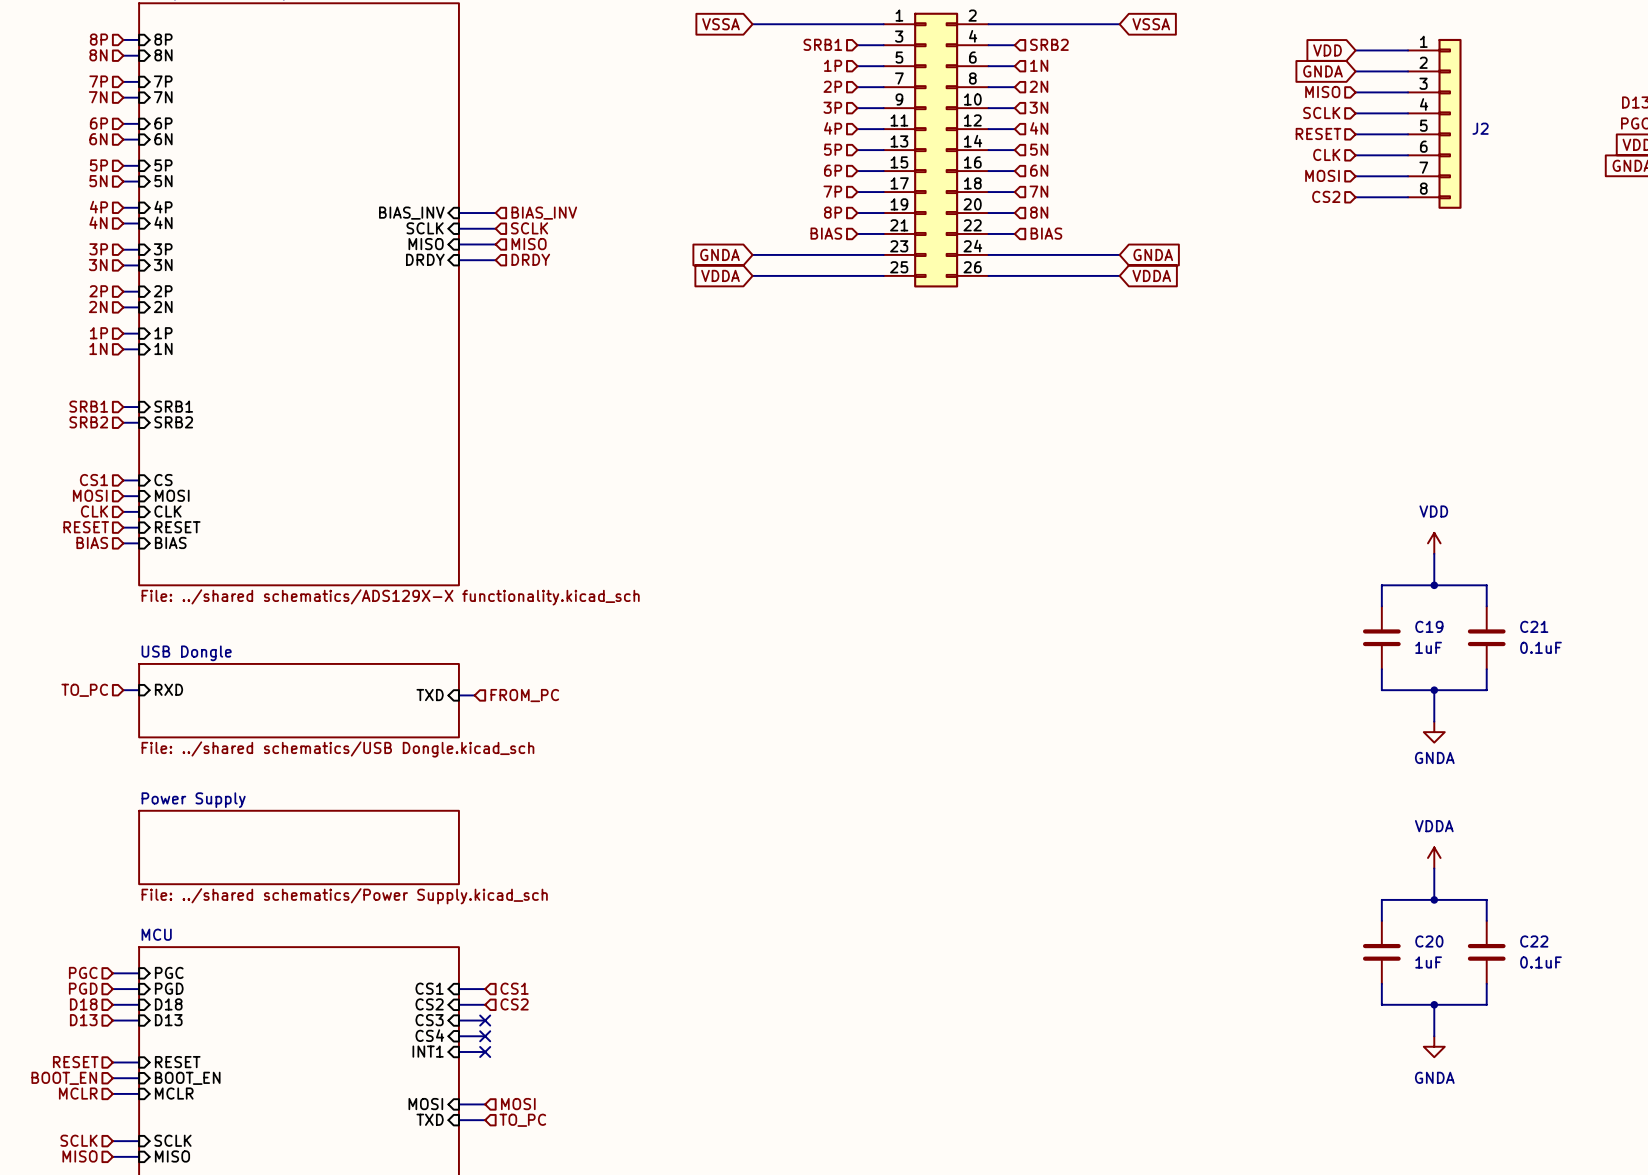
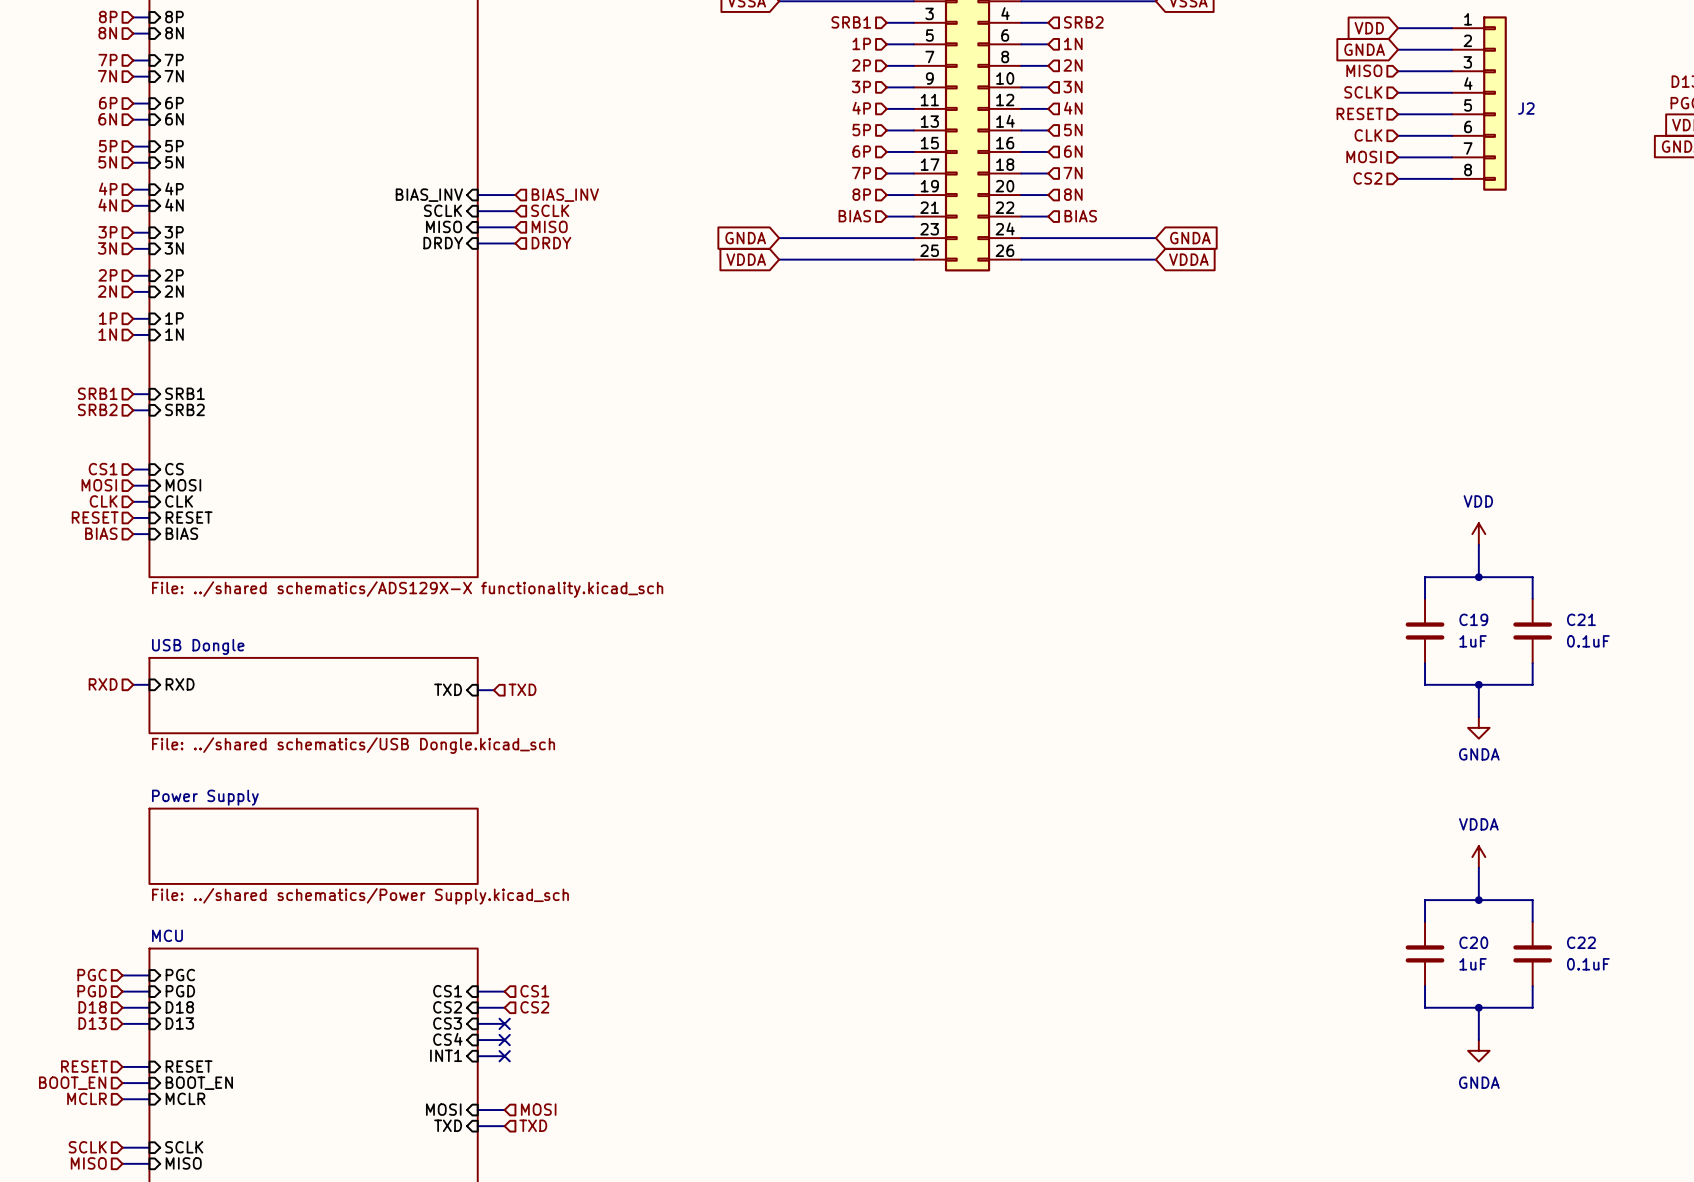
hierarchical label: TO_PC (84, 690) -> RXD (103, 684)
hierarchical label: FROM_PC (524, 695) -> TXD (522, 689)
hierarchical label: TO_PC (522, 1120) -> TXD (533, 1125)

